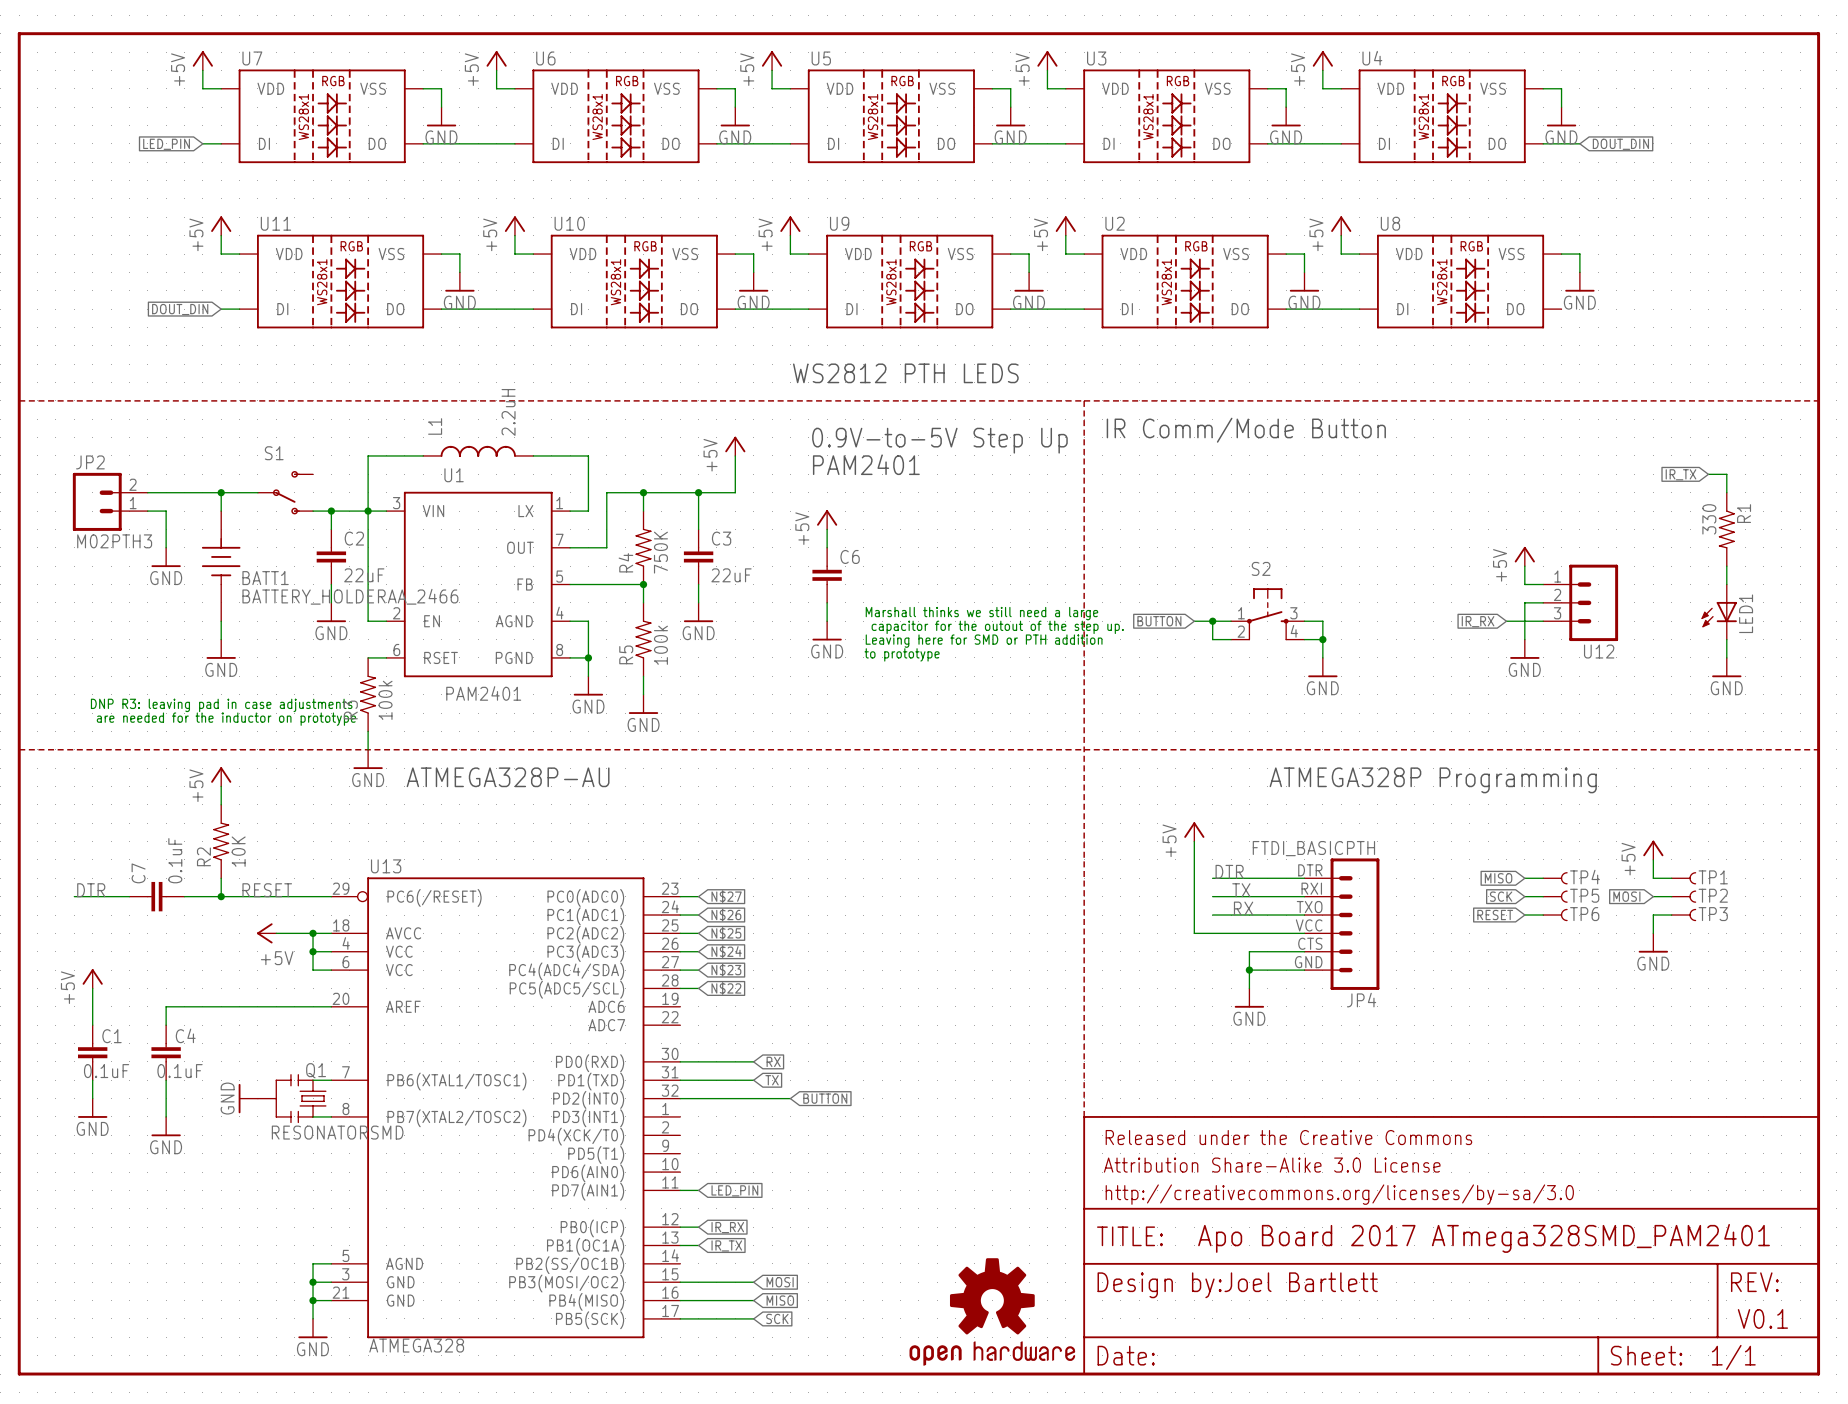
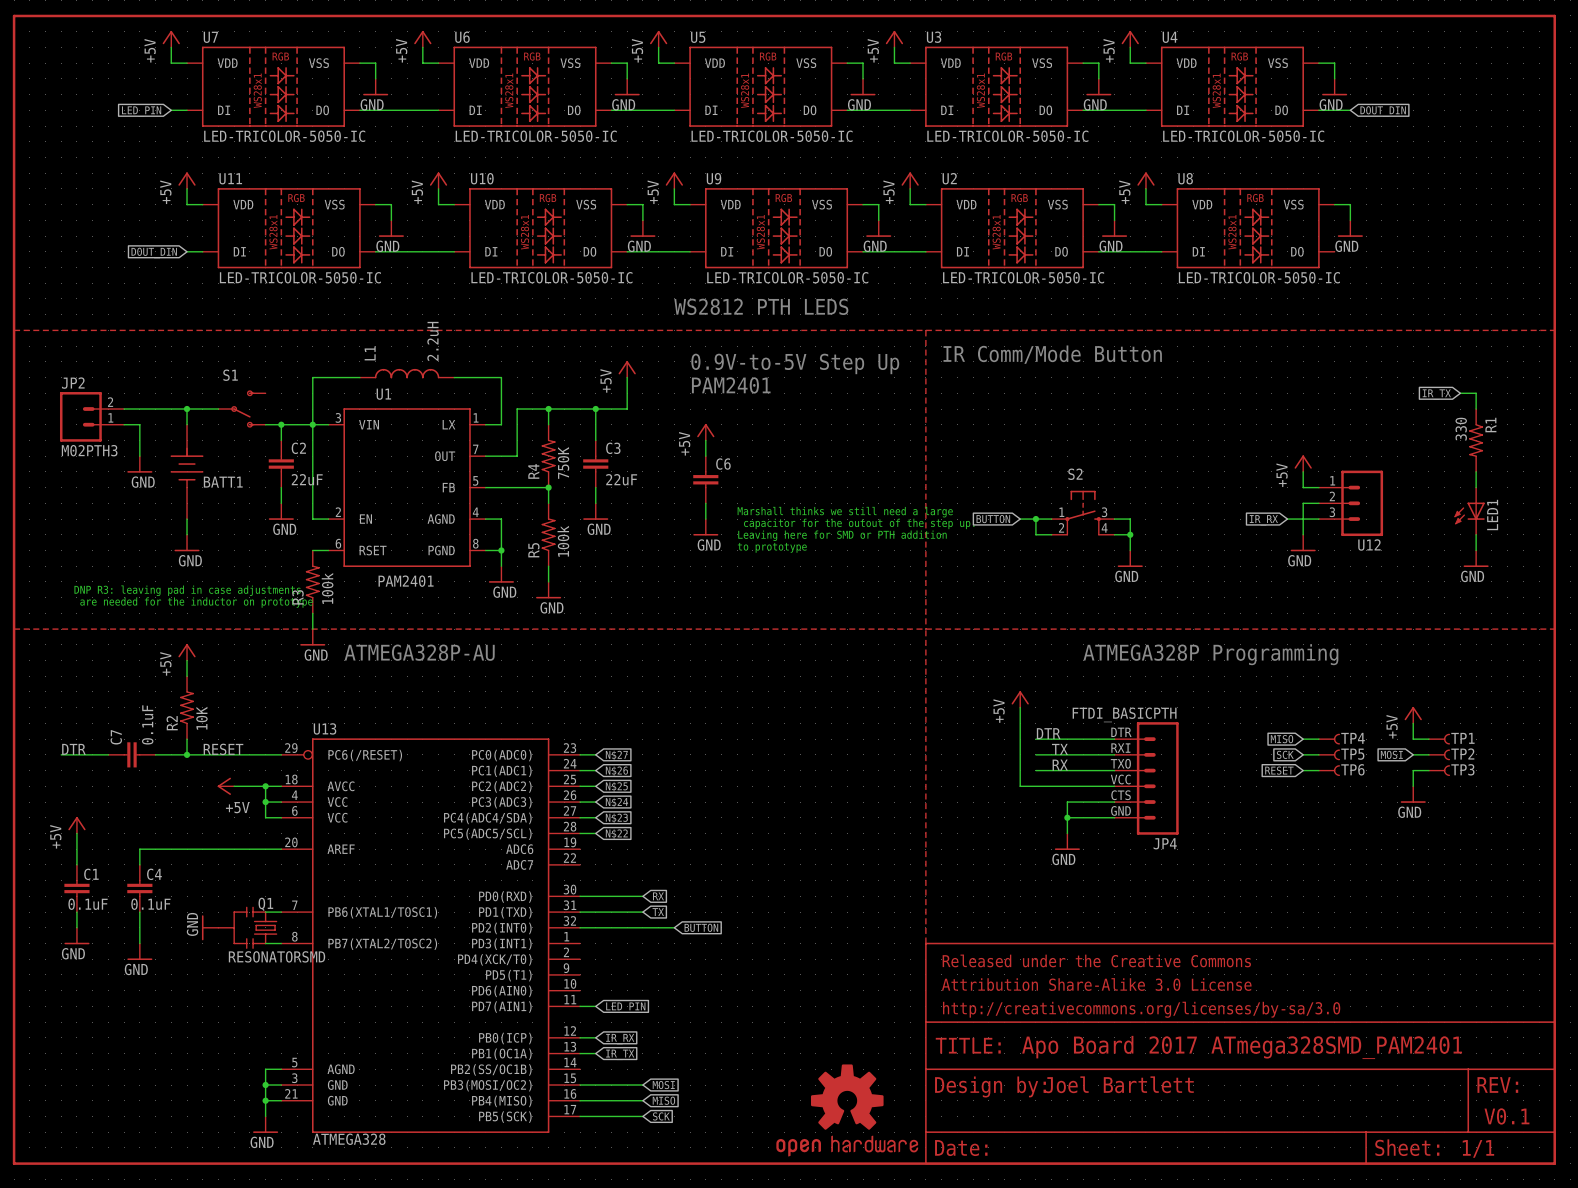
U7 value: none -> LED-TRICOLOR-5050-IC (284, 136)
U6 value: none -> LED-TRICOLOR-5050-IC (536, 136)
U5 value: none -> LED-TRICOLOR-5050-IC (772, 136)
U3 value: none -> LED-TRICOLOR-5050-IC (1007, 136)
U4 value: none -> LED-TRICOLOR-5050-IC (1243, 136)
U11 value: none -> LED-TRICOLOR-5050-IC (300, 277)
U10 value: none -> LED-TRICOLOR-5050-IC (551, 277)
U9 value: none -> LED-TRICOLOR-5050-IC (787, 277)
U2 value: none -> LED-TRICOLOR-5050-IC (1023, 277)
U8 value: none -> LED-TRICOLOR-5050-IC (1259, 277)
BATT1 value: BATTERY_HOLDERAA_2466 (350, 596) -> none

